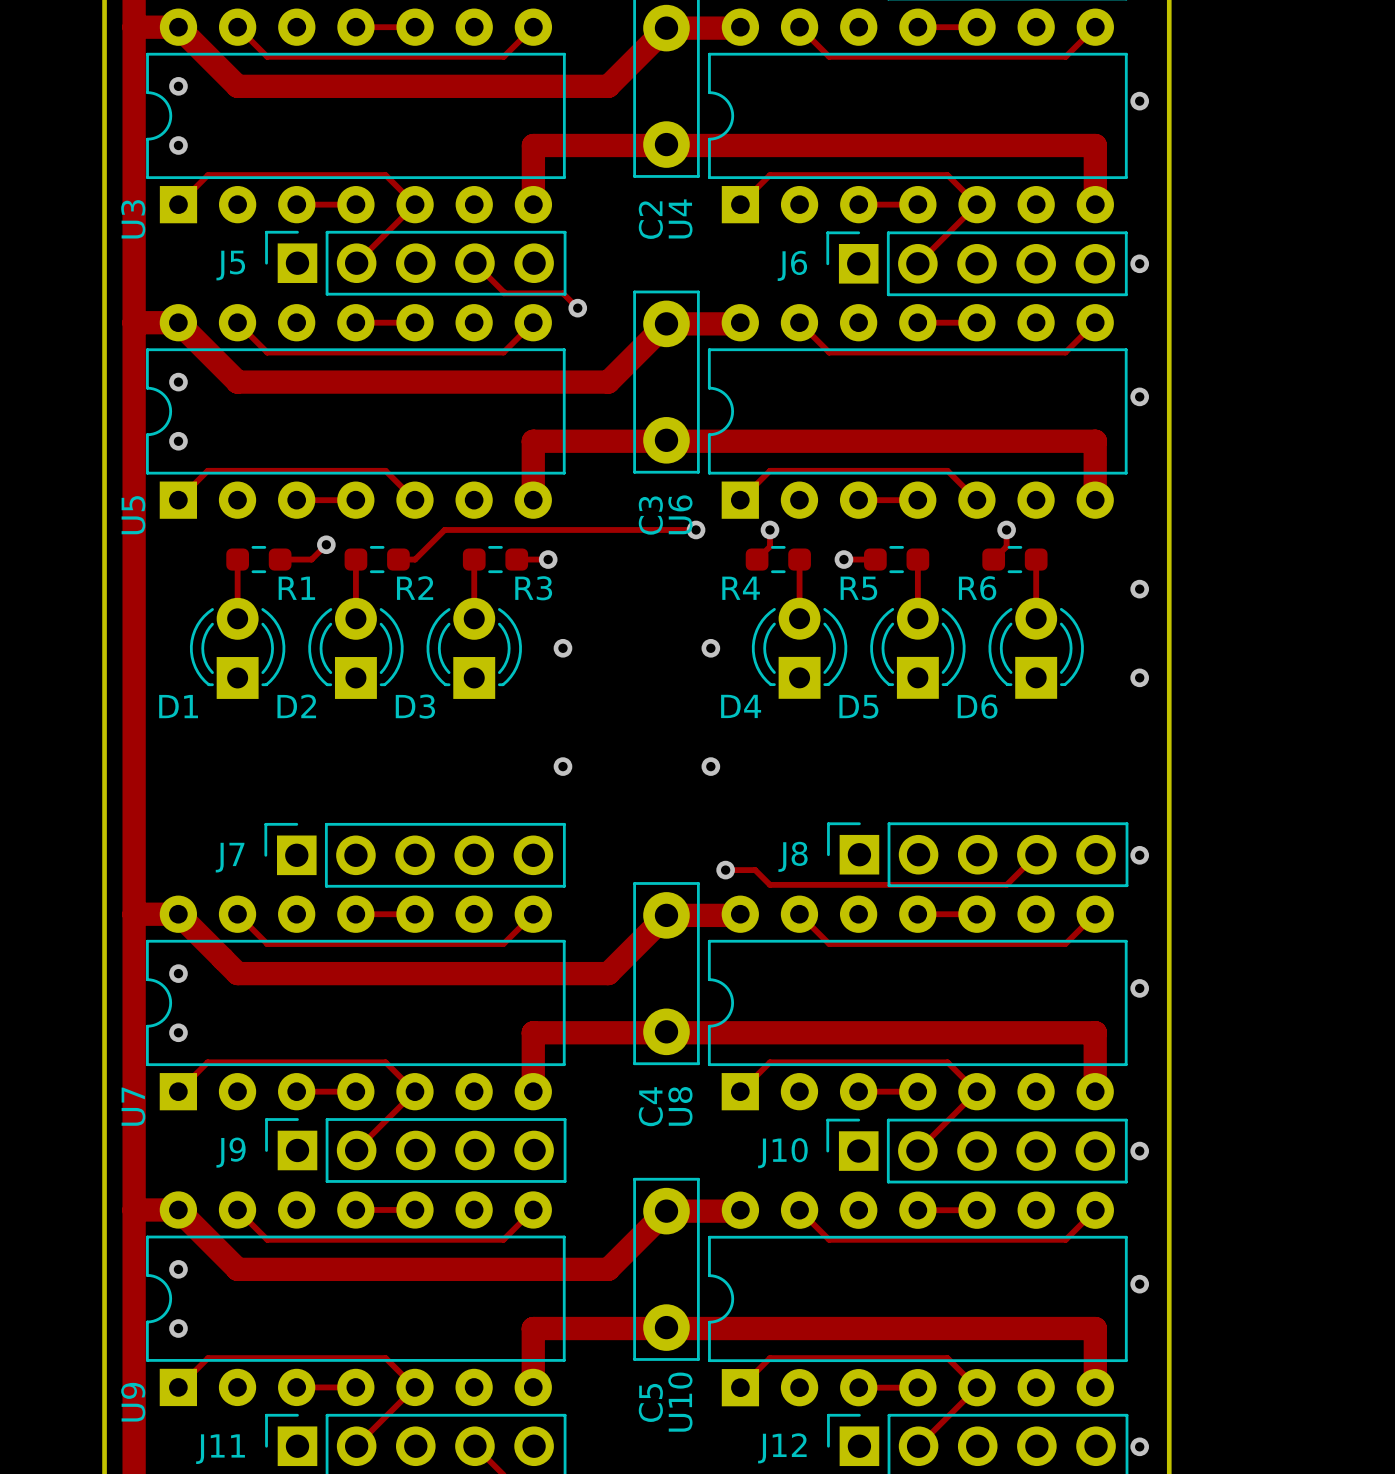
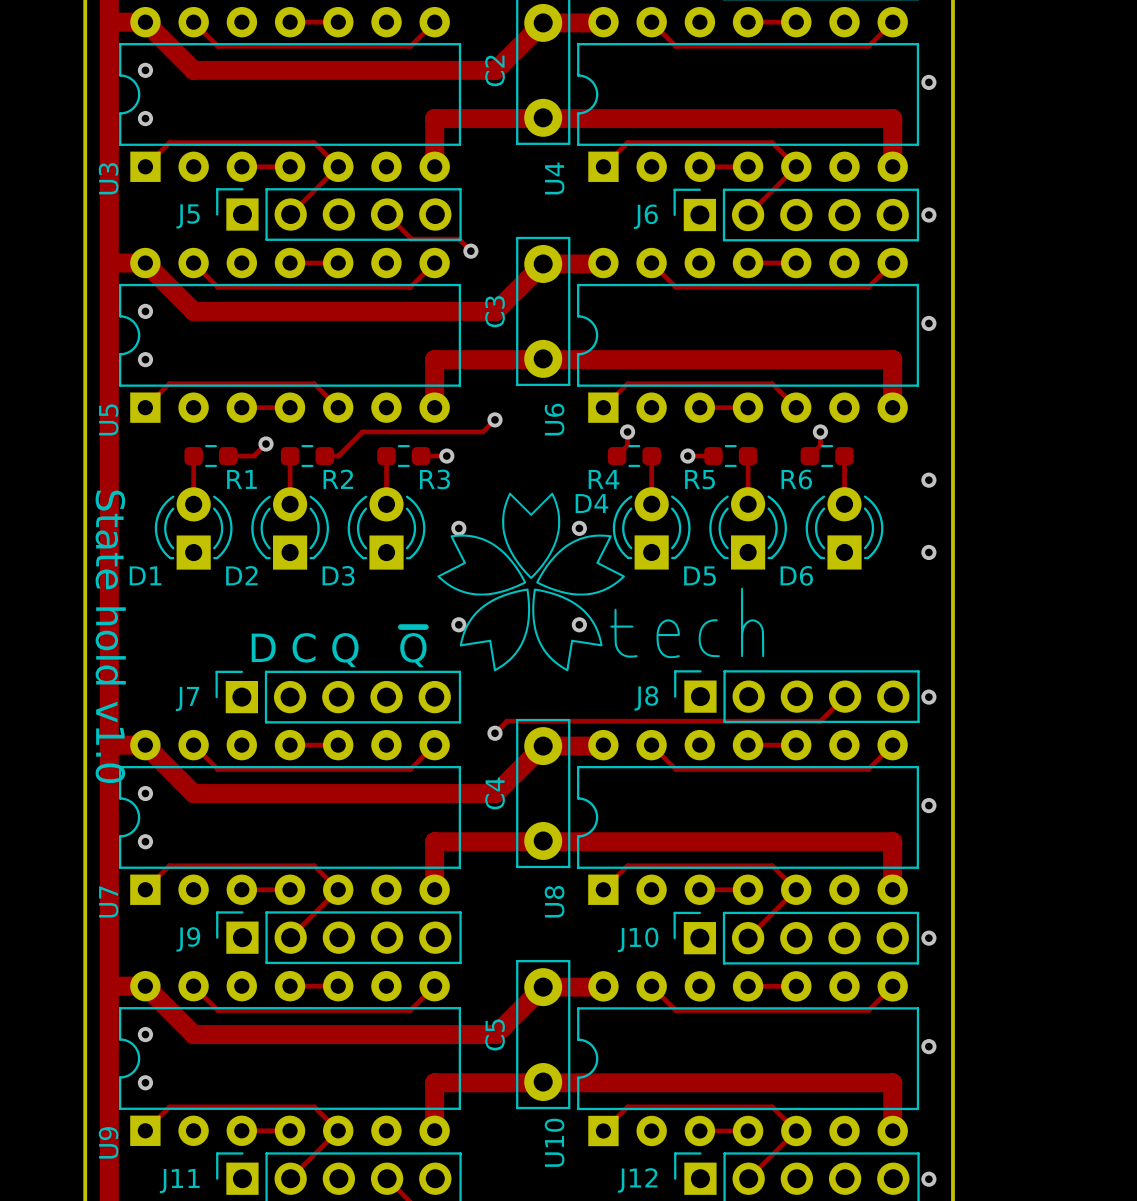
C2 name position: C2 (650, 220) -> C2 (495, 70)
C3 name position: C3 (650, 515) -> C3 (495, 311)
track: (592, 529) (696, 529) -> (482, 431) (494, 419)
via position: (696, 529) -> (494, 419)
drawing: none -> [437, 492, 765, 672]
D4 name position: D4 (741, 706) -> D4 (591, 503)
text: none -> State hold v1.0 (110, 636)
text: none -> D C Q ~{Q} (339, 647)
track: (725, 870) (755, 870) (770, 884) -> (494, 733) (507, 721) (627, 721)
via position: (725, 870) -> (494, 733)
C4 name position: C4 (650, 1106) -> C4 (495, 793)
C5 name position: C5 (650, 1402) -> C5 (495, 1034)

